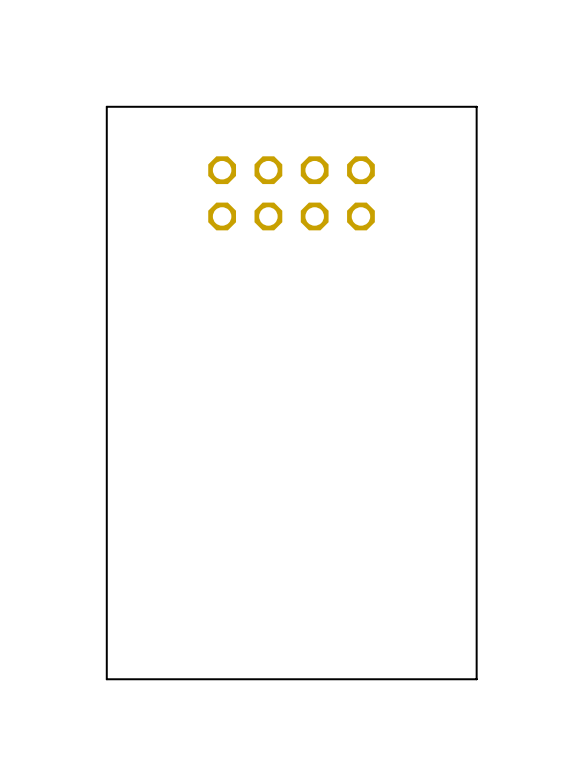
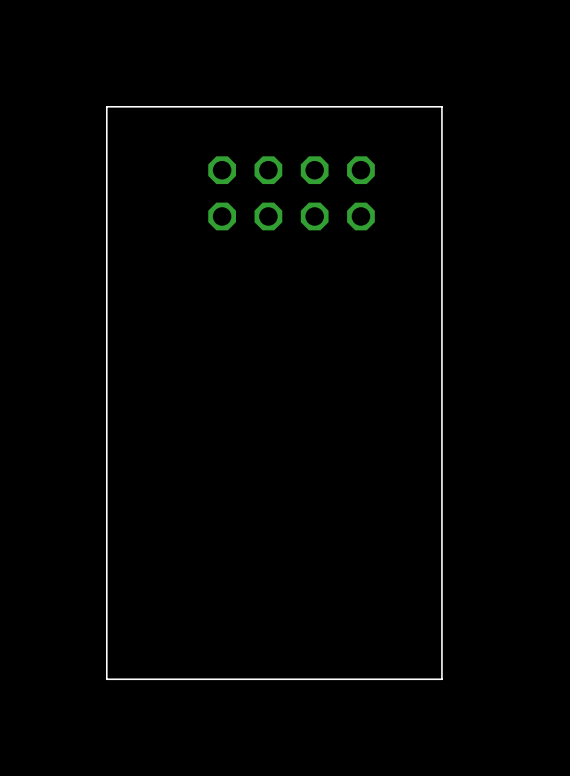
board edge: (441, 106) (476, 106) (476, 679) (441, 679) -> (441, 106) (441, 679)

